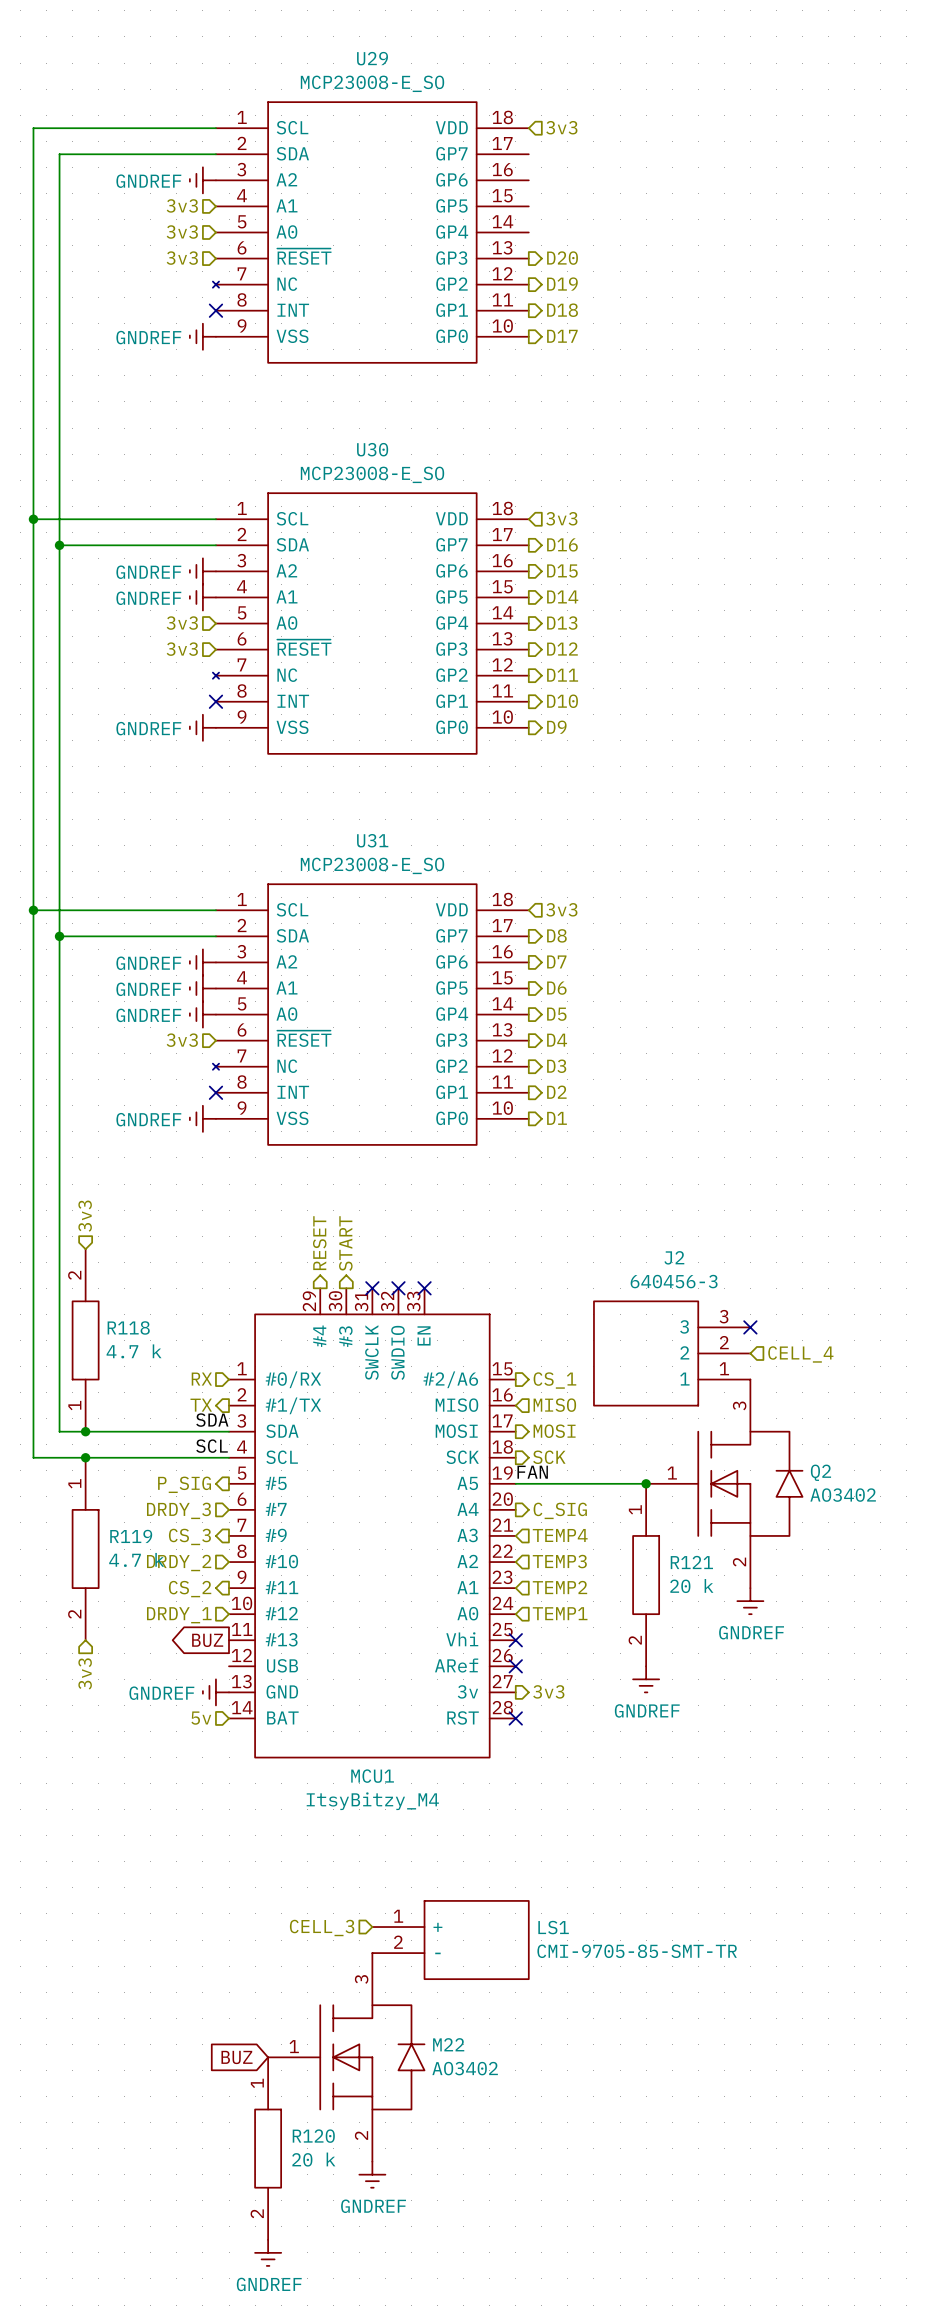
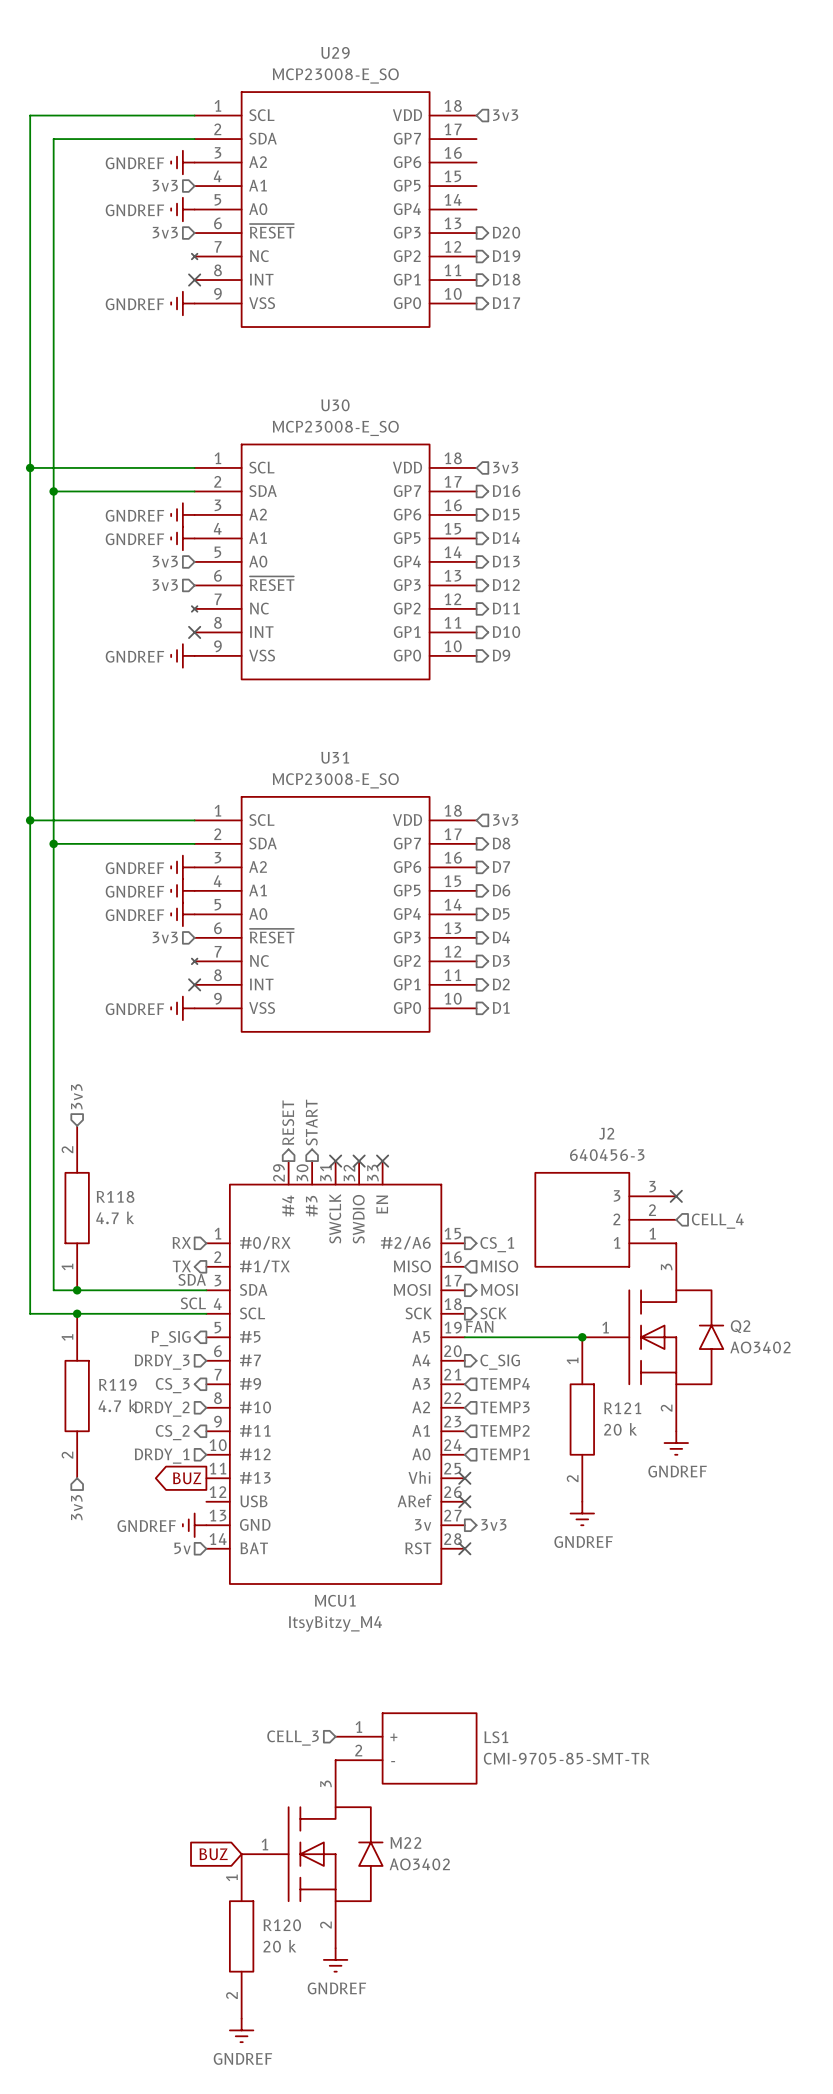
hierarchical label: 3v3 (182, 232) -> none
power symbol: none -> GNDREF (182, 209)

